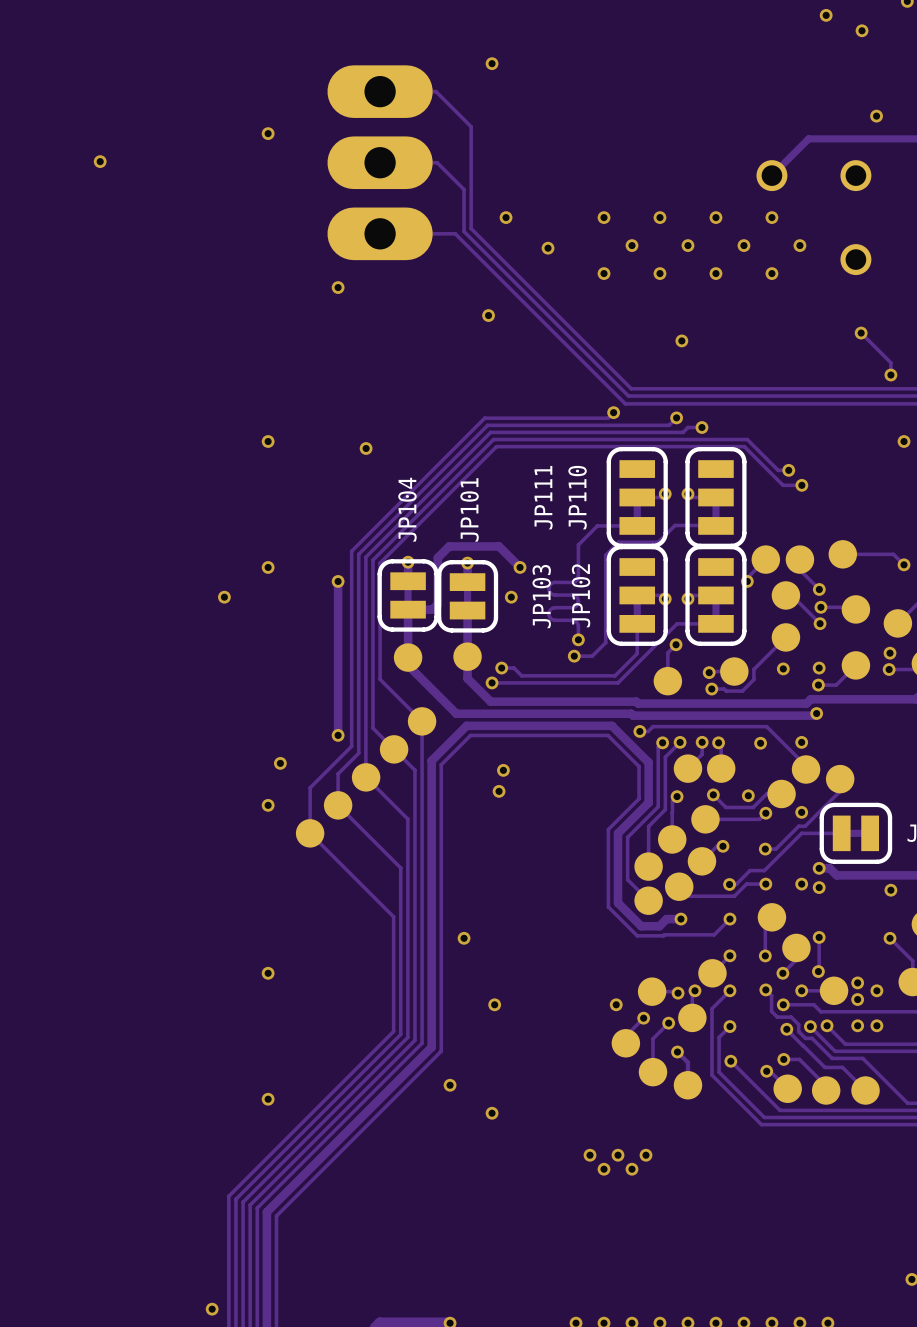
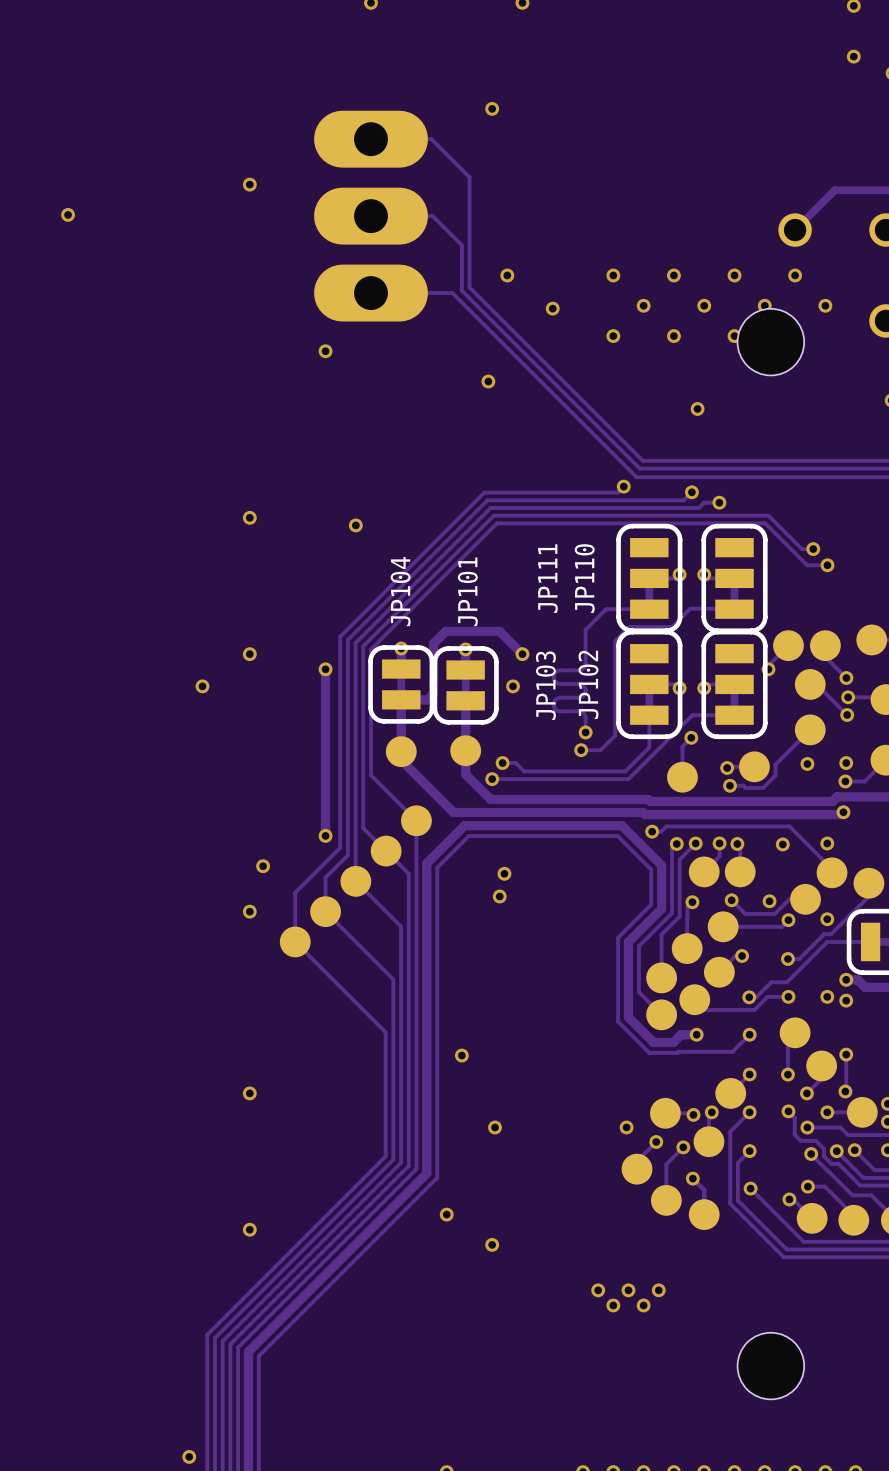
hole: none -> (770, 342)
hole: none -> (770, 1366)

